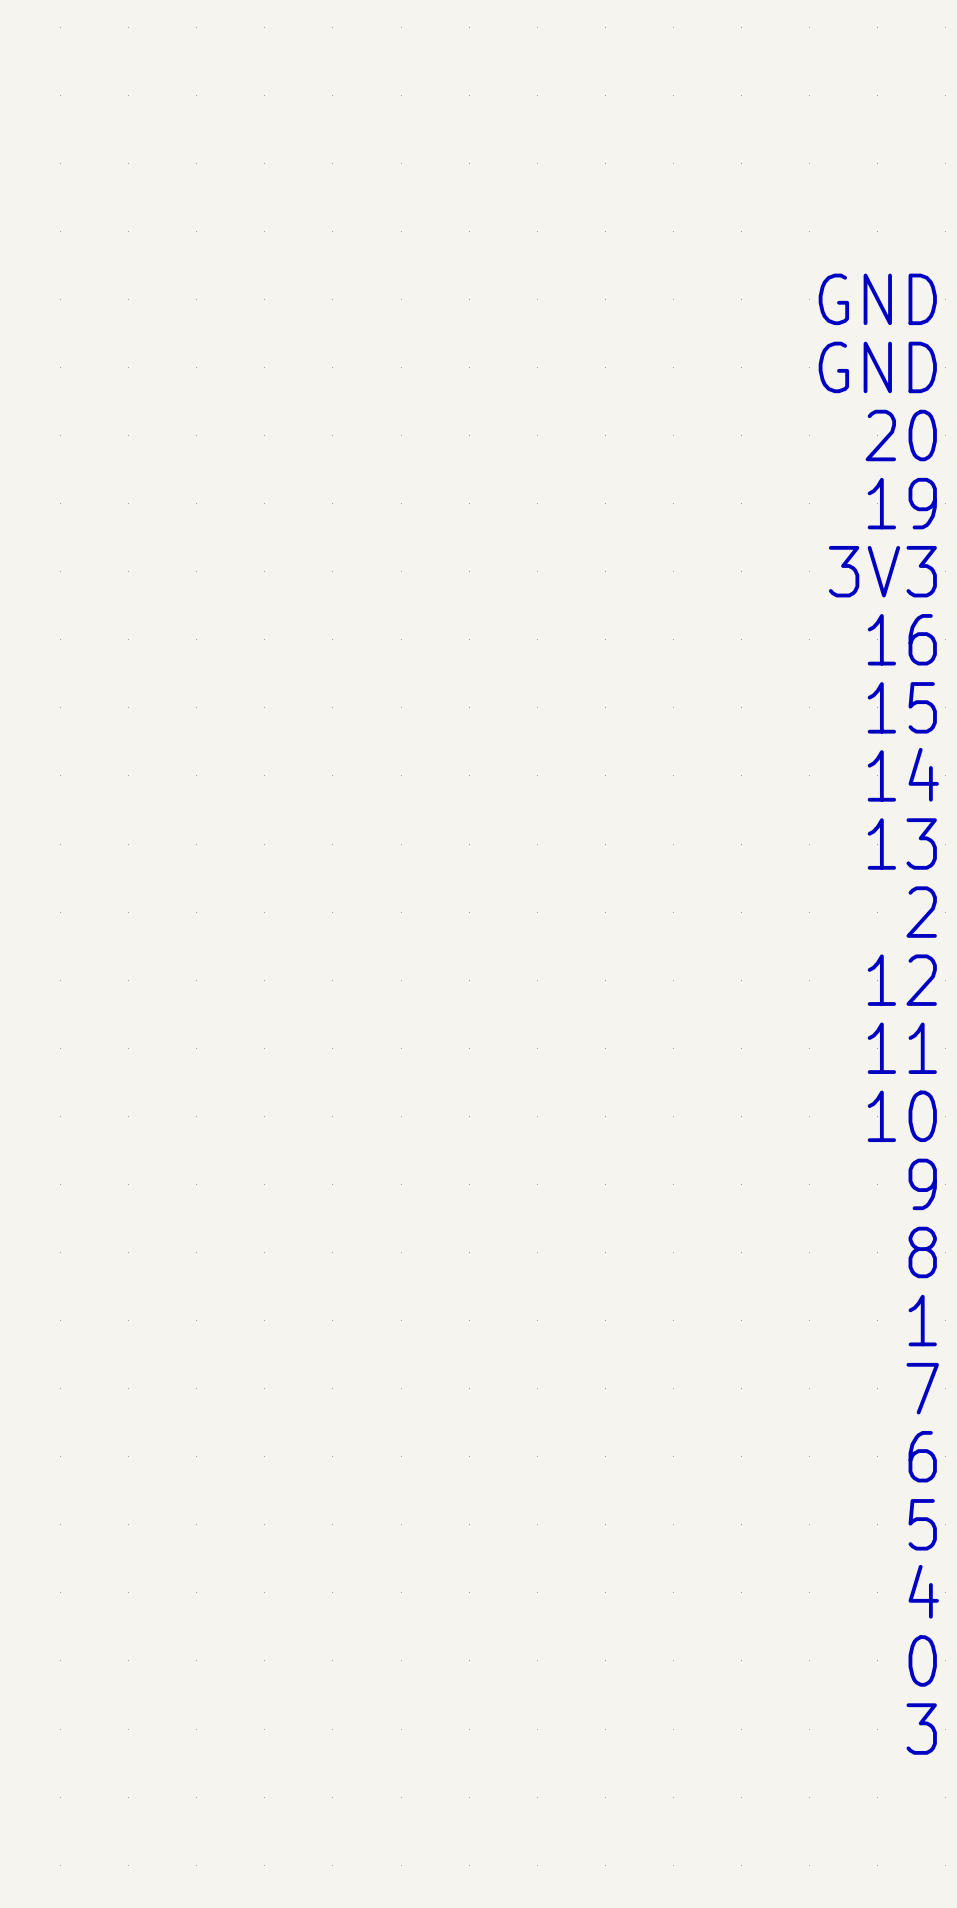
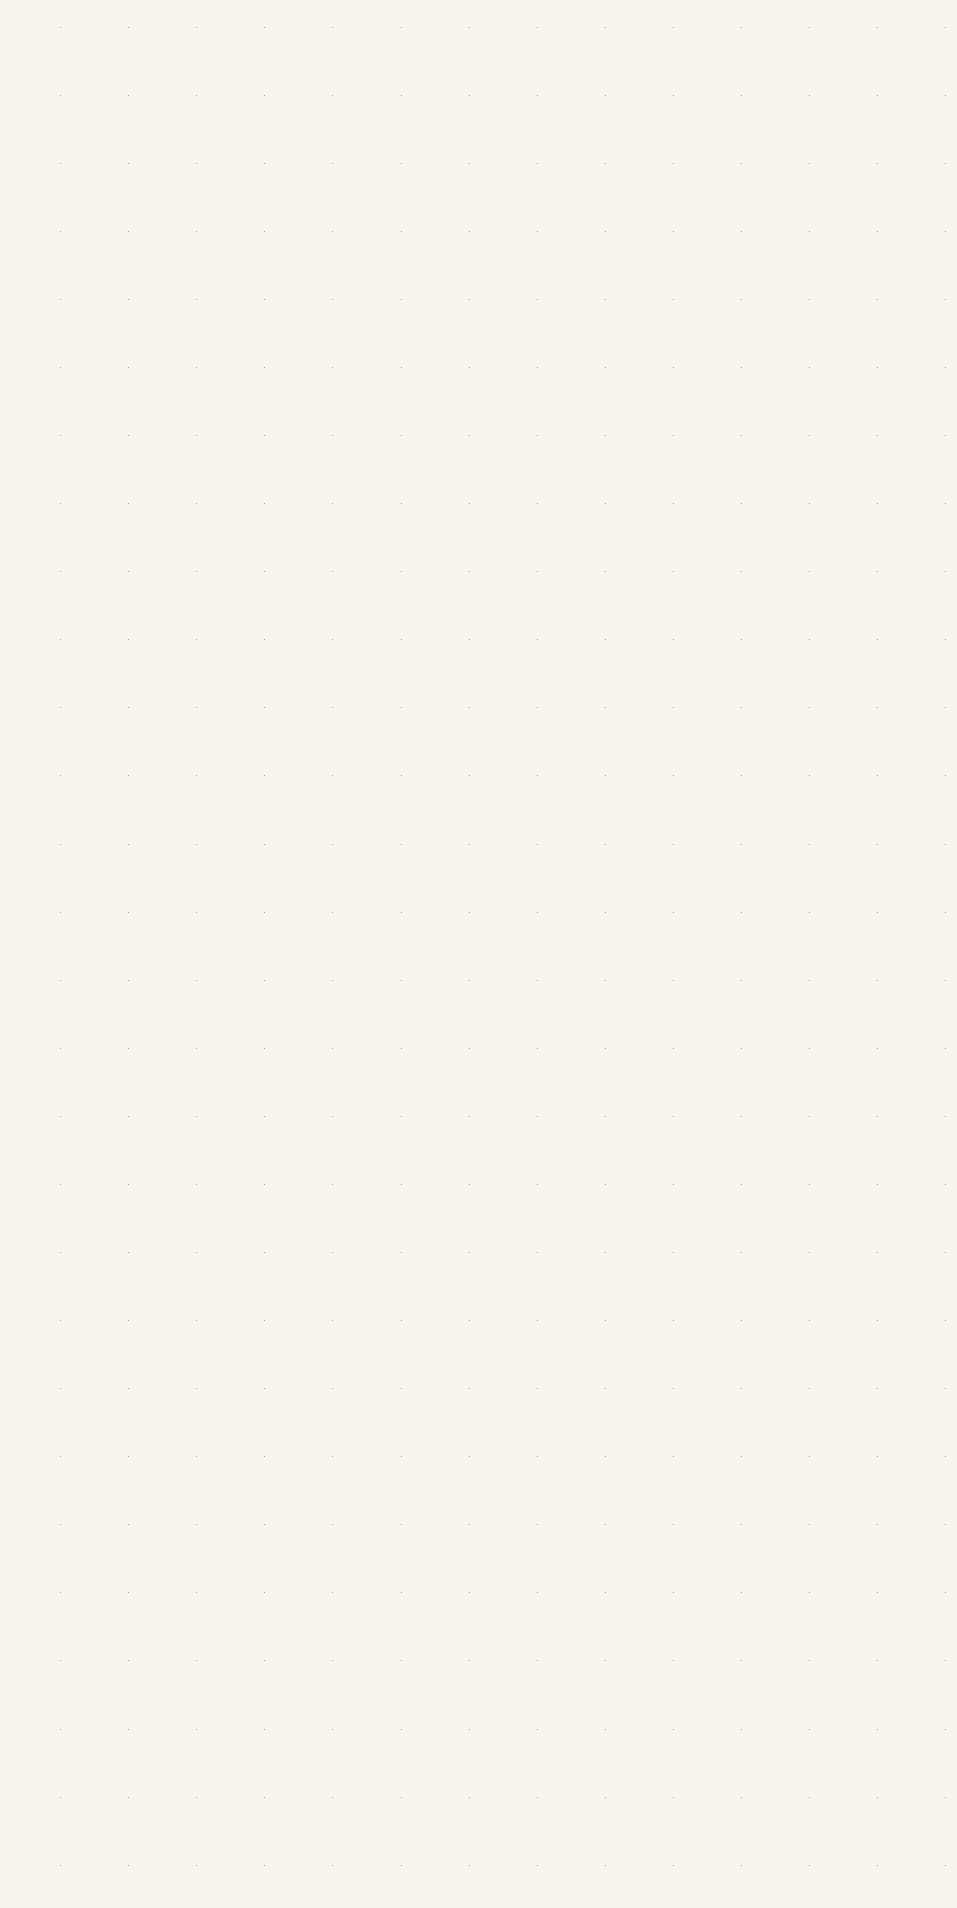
text: GND (877, 299) -> none
text: GND (877, 367) -> none
text: 20 (901, 435) -> none
text: 19 (902, 503) -> none
text: 3V3 (882, 571) -> none
text: 16 (902, 639) -> none
text: 15 (902, 707) -> none
text: 14 (903, 774) -> none
text: 13 (902, 844) -> none
text: 2 (921, 912) -> none
text: 12 (902, 980) -> none
text: 11 (902, 1048) -> none
text: 10 (902, 1116) -> none
text: 9 (922, 1184) -> none
text: 8 (922, 1252) -> none
text: 1 (922, 1320) -> none
text: 7 (922, 1388) -> none
text: 6 (922, 1456) -> none
text: 5 (922, 1524) -> none
text: 4 (923, 1591) -> none
text: 0 (922, 1660) -> none
text: 3 (921, 1729) -> none

